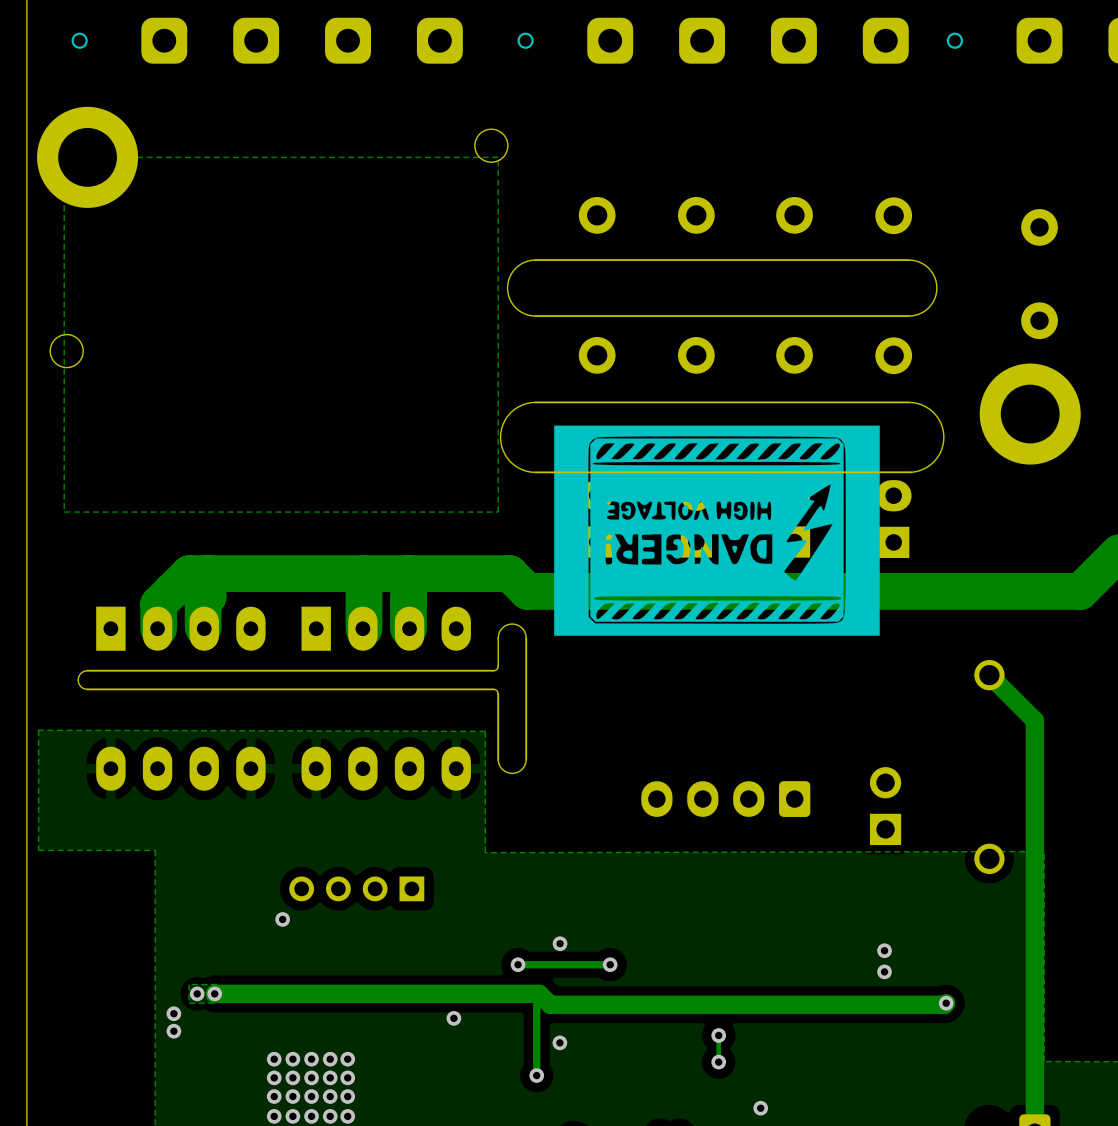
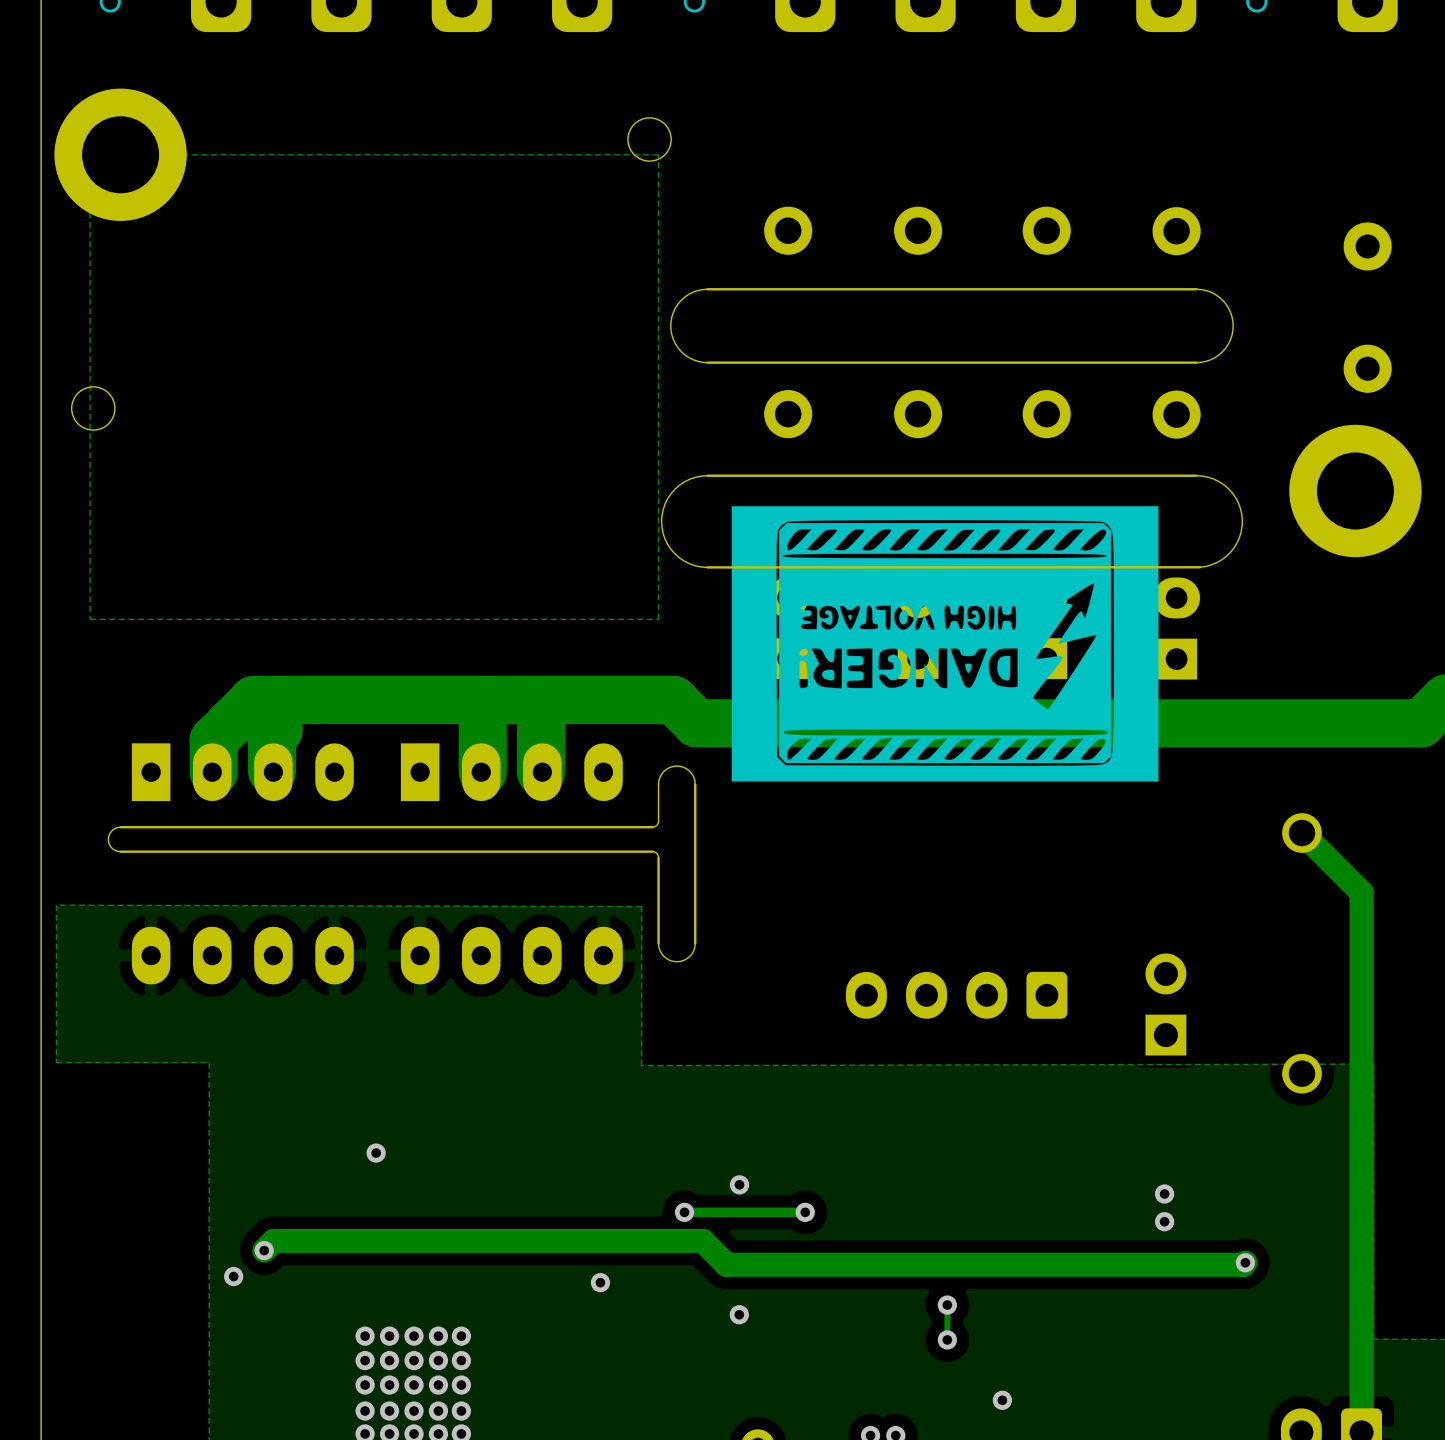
part: (356, 888) -> none
zone outline: (217, 984) (217, 1003) (189, 1003) (189, 984) (217, 984) -> none
track: (214, 993) (539, 993) (536, 996) (536, 1075) -> none
via: (214, 993) -> none
track: none -> (712, 1250) (702, 1240) (273, 1240) (264, 1250)
via: (173, 1031) -> none
via: (536, 1075) -> none

